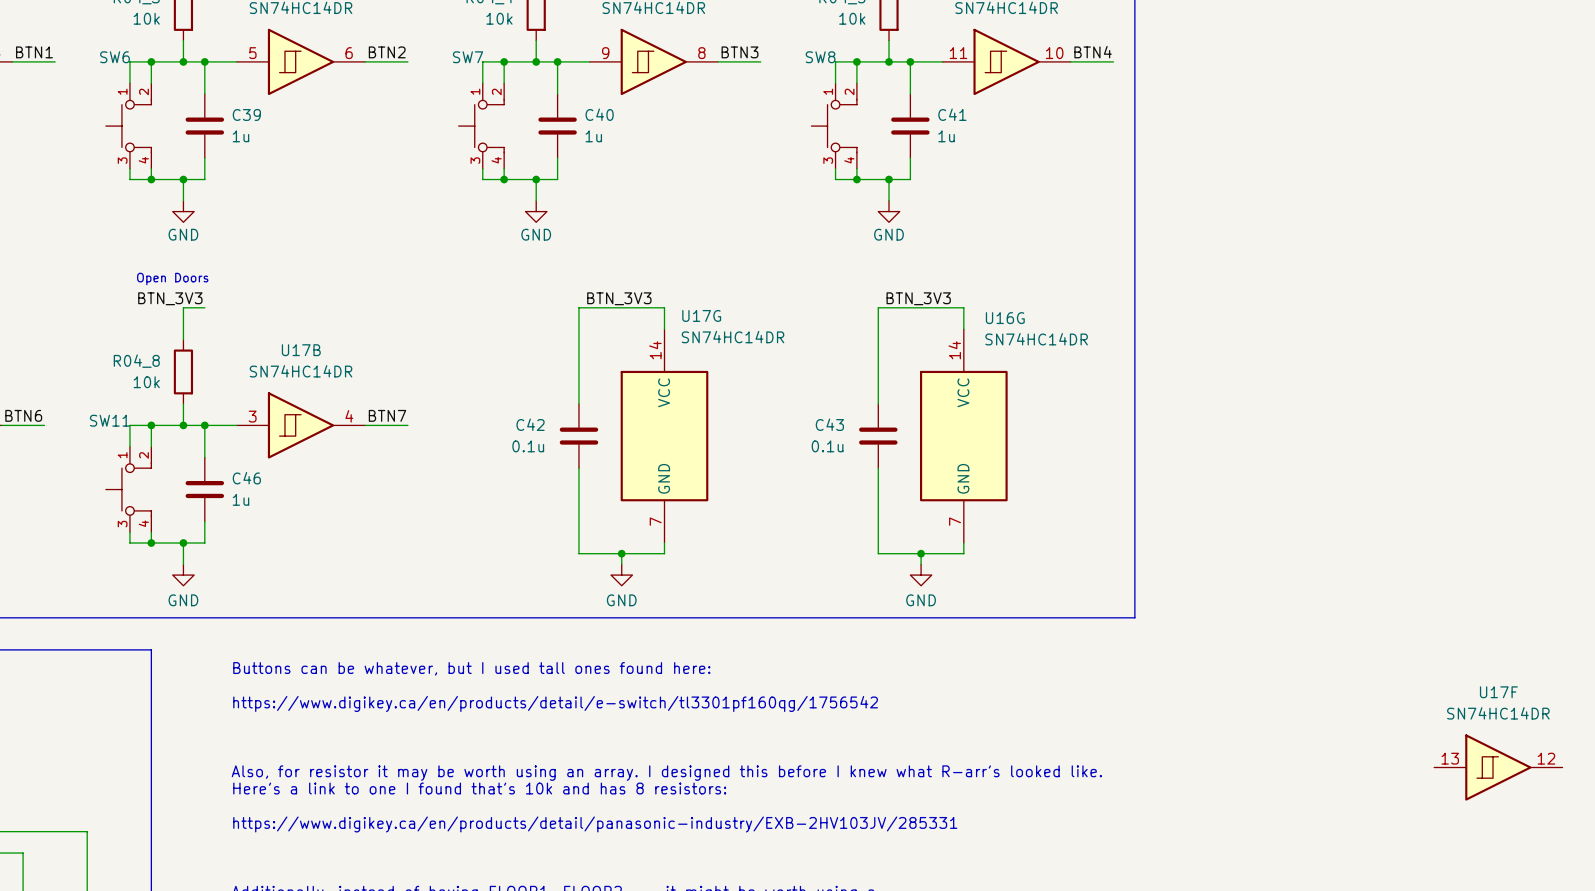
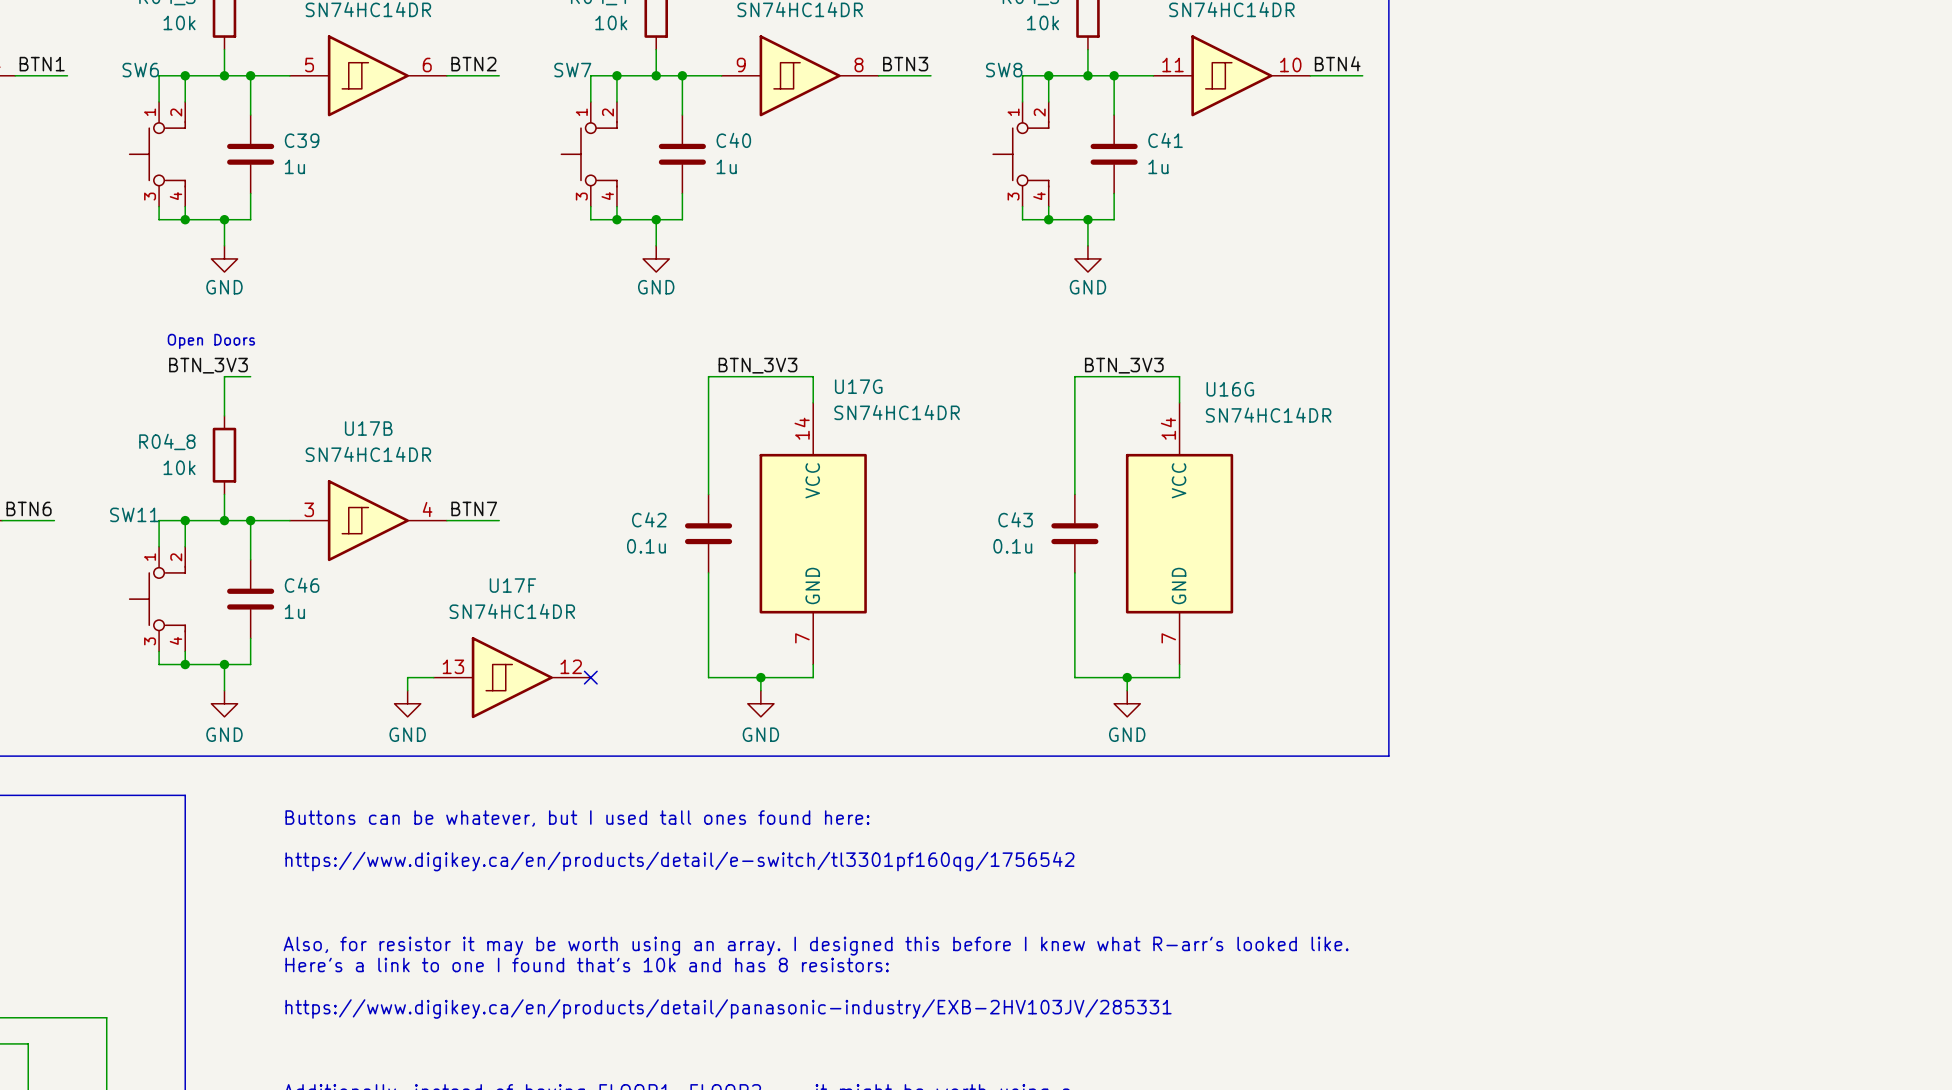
wire: none -> (433, 677) (407, 677) (407, 690)
no-connect mark: none -> (590, 677)
power symbol: none -> GND (407, 703)
U17F position: (1498, 767) -> (512, 677)

